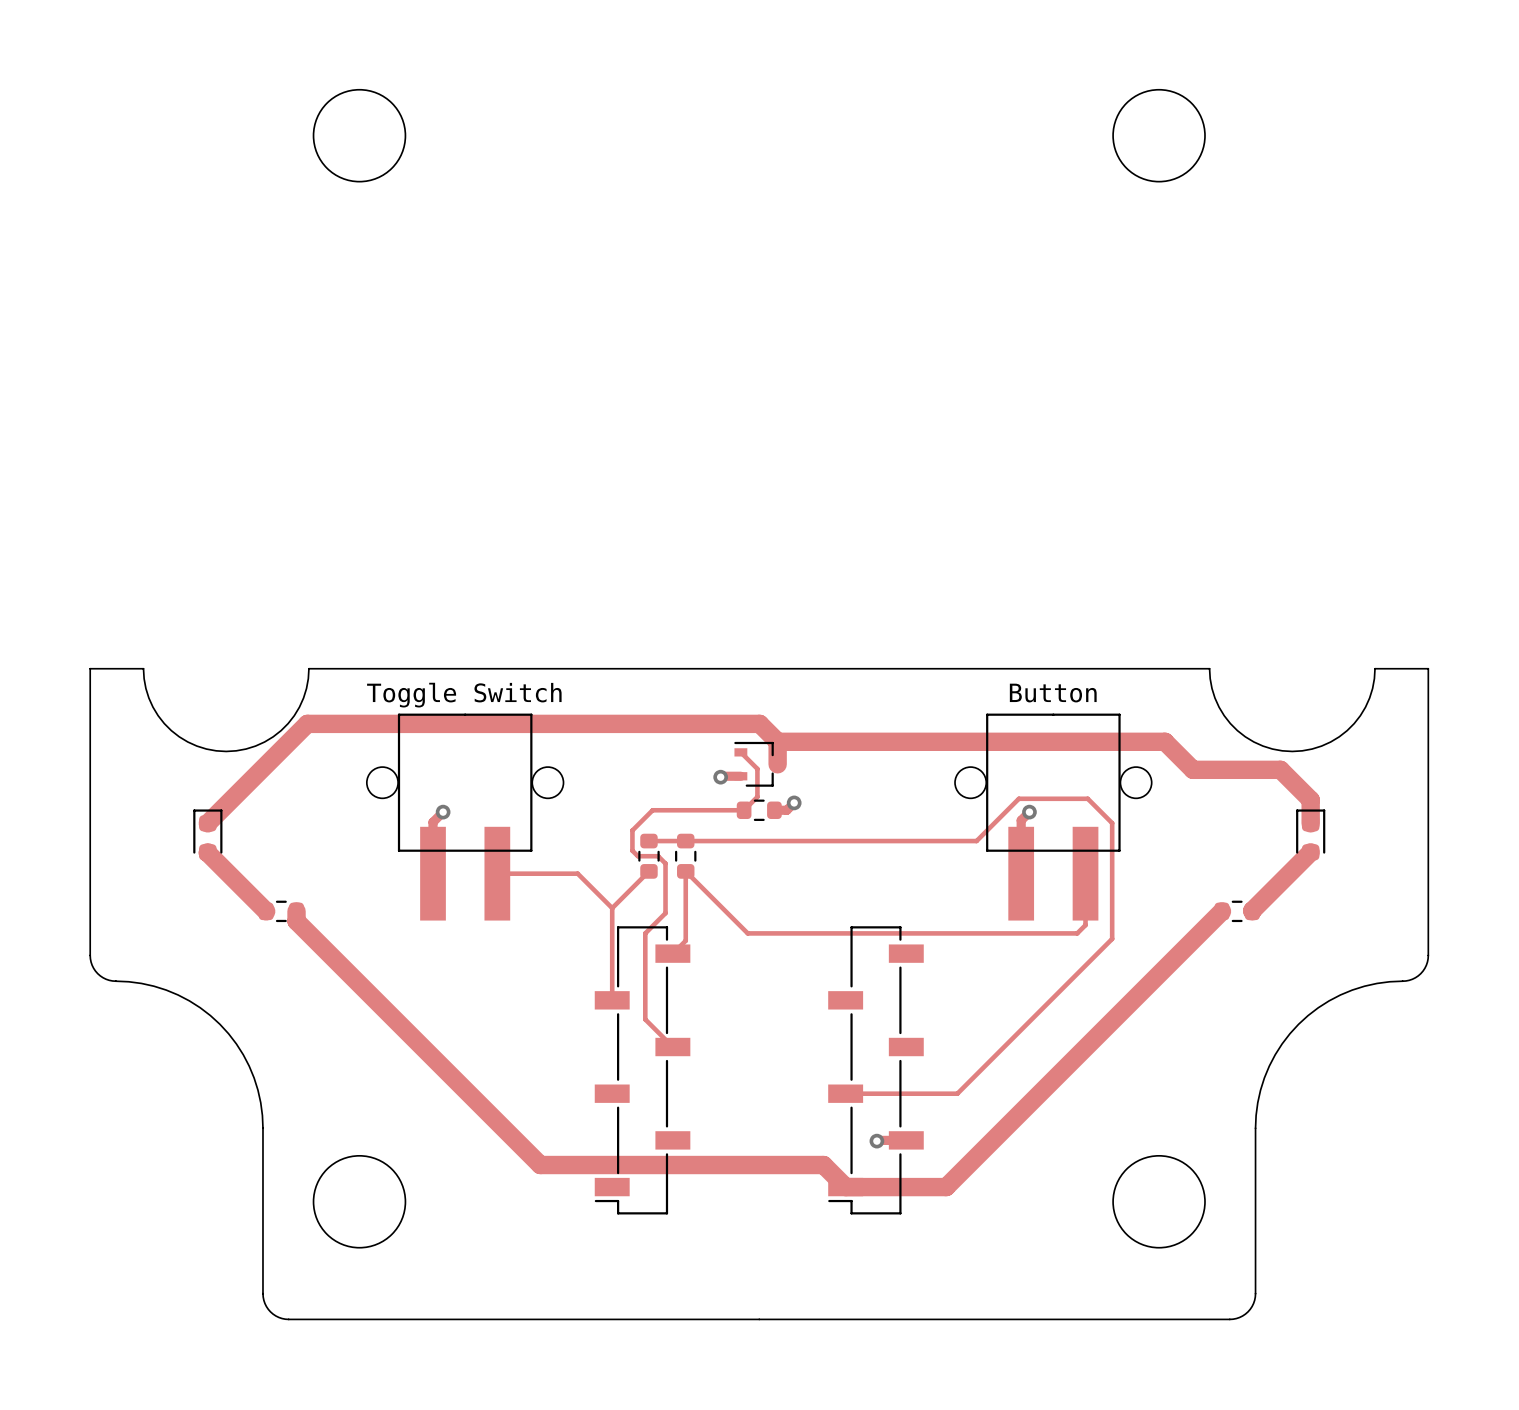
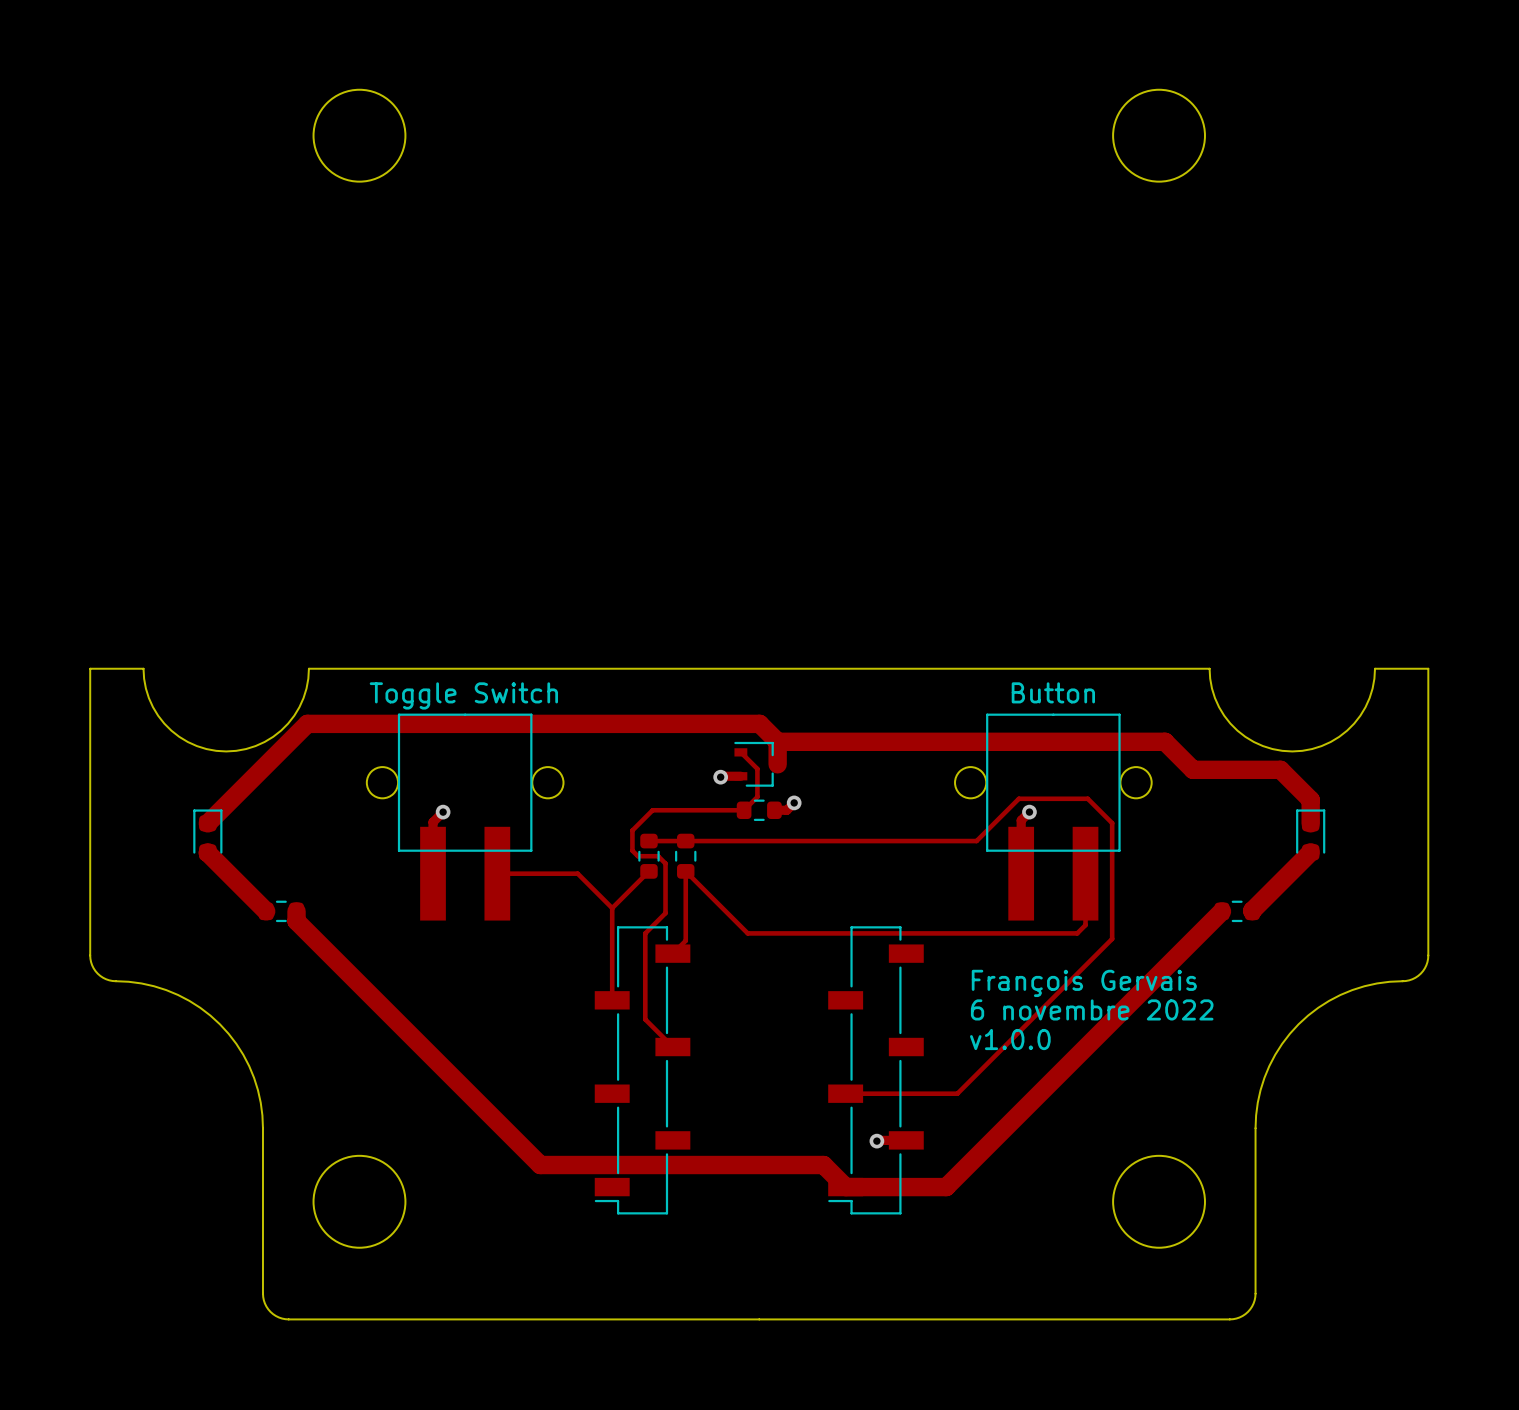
text: none -> François Gervais (1084, 983)
text: none -> 6 novembre 2022 (1092, 1009)
text: none -> v1.0.0 (1010, 1039)

